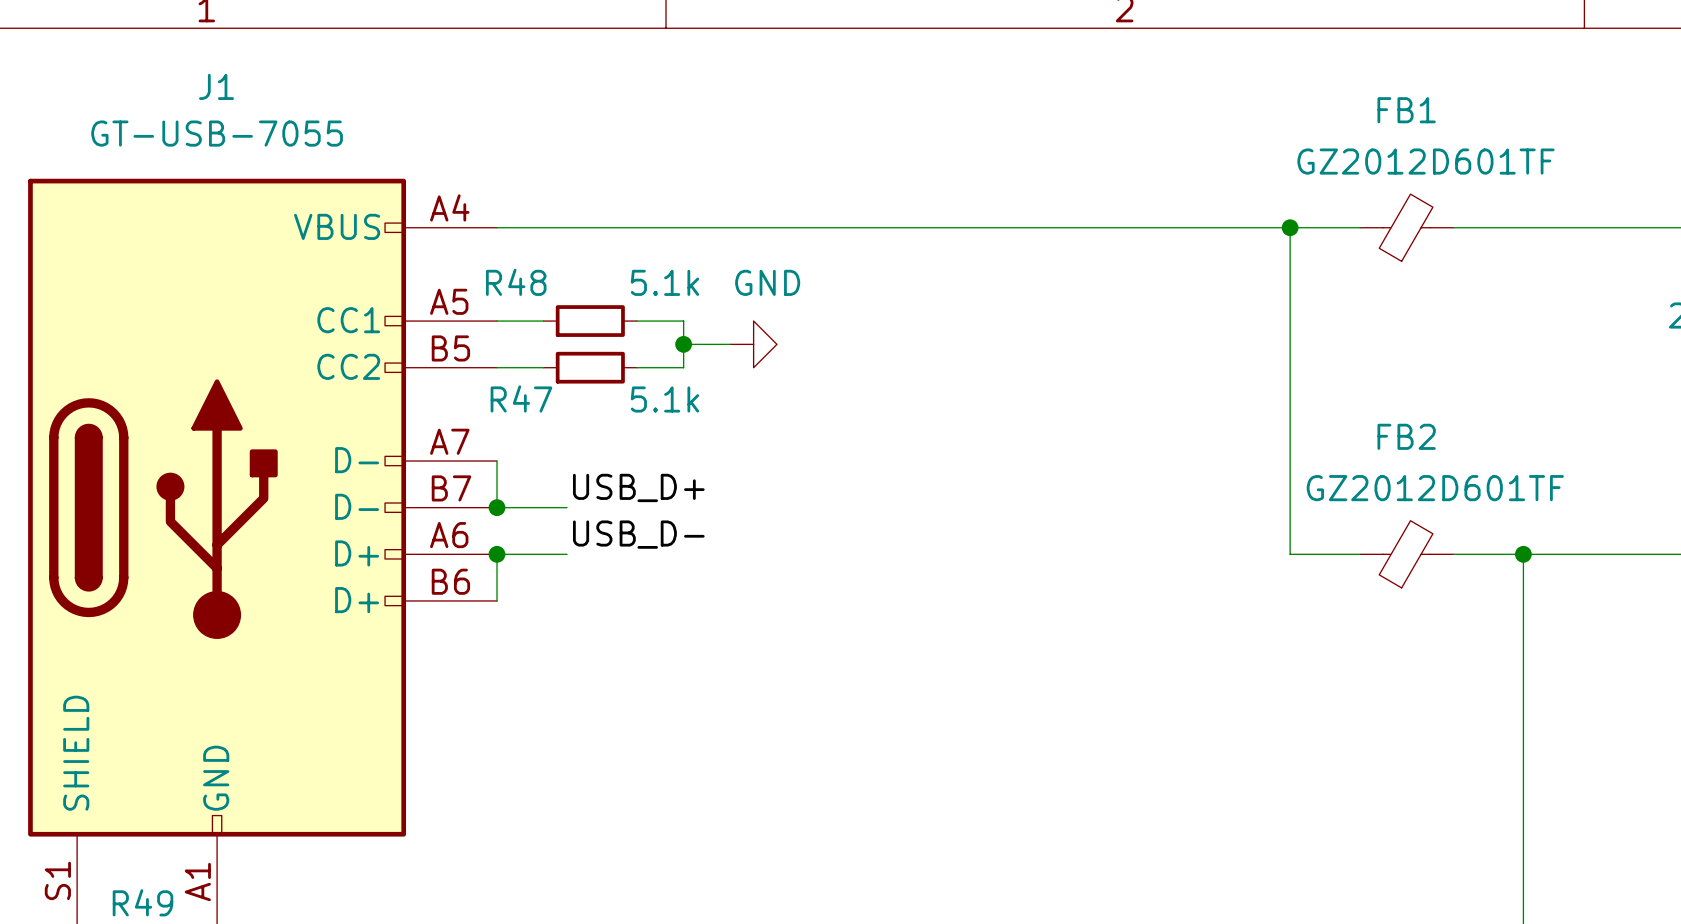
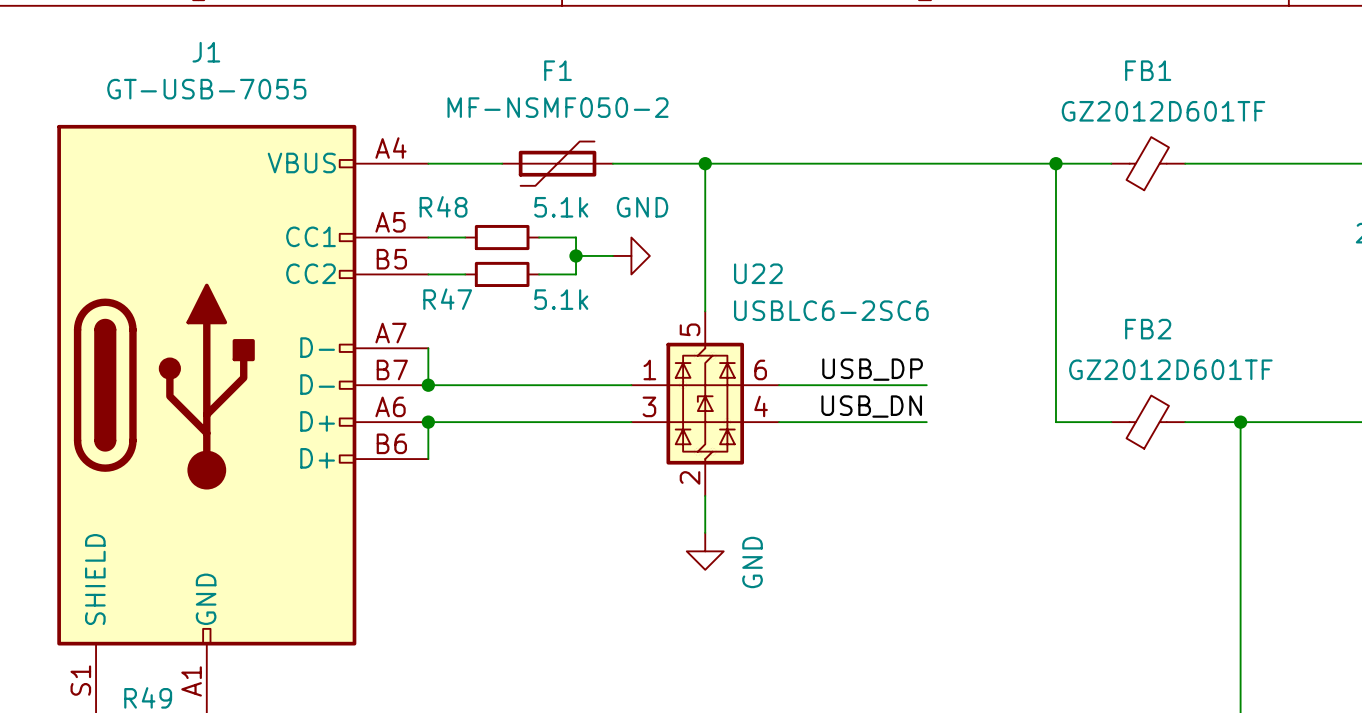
F1: none -> MF-NSMF050-2 (557, 163)
wire: none -> (705, 163) (705, 311)
junction: none -> (705, 163)
label: USB_D+ (638, 487) -> none
label: none -> USB_DP (872, 369)
wire: none -> (483, 385) (631, 385)
wire: none -> (779, 385) (926, 385)
U22: none -> USBLC6-2SC6 (705, 403)
label: USB_D- (638, 534) -> none
label: none -> USB_DN (871, 406)
wire: none -> (483, 422) (631, 422)
wire: none -> (779, 422) (926, 422)
wire: none -> (705, 495) (705, 532)
power symbol: none -> GND (705, 551)

